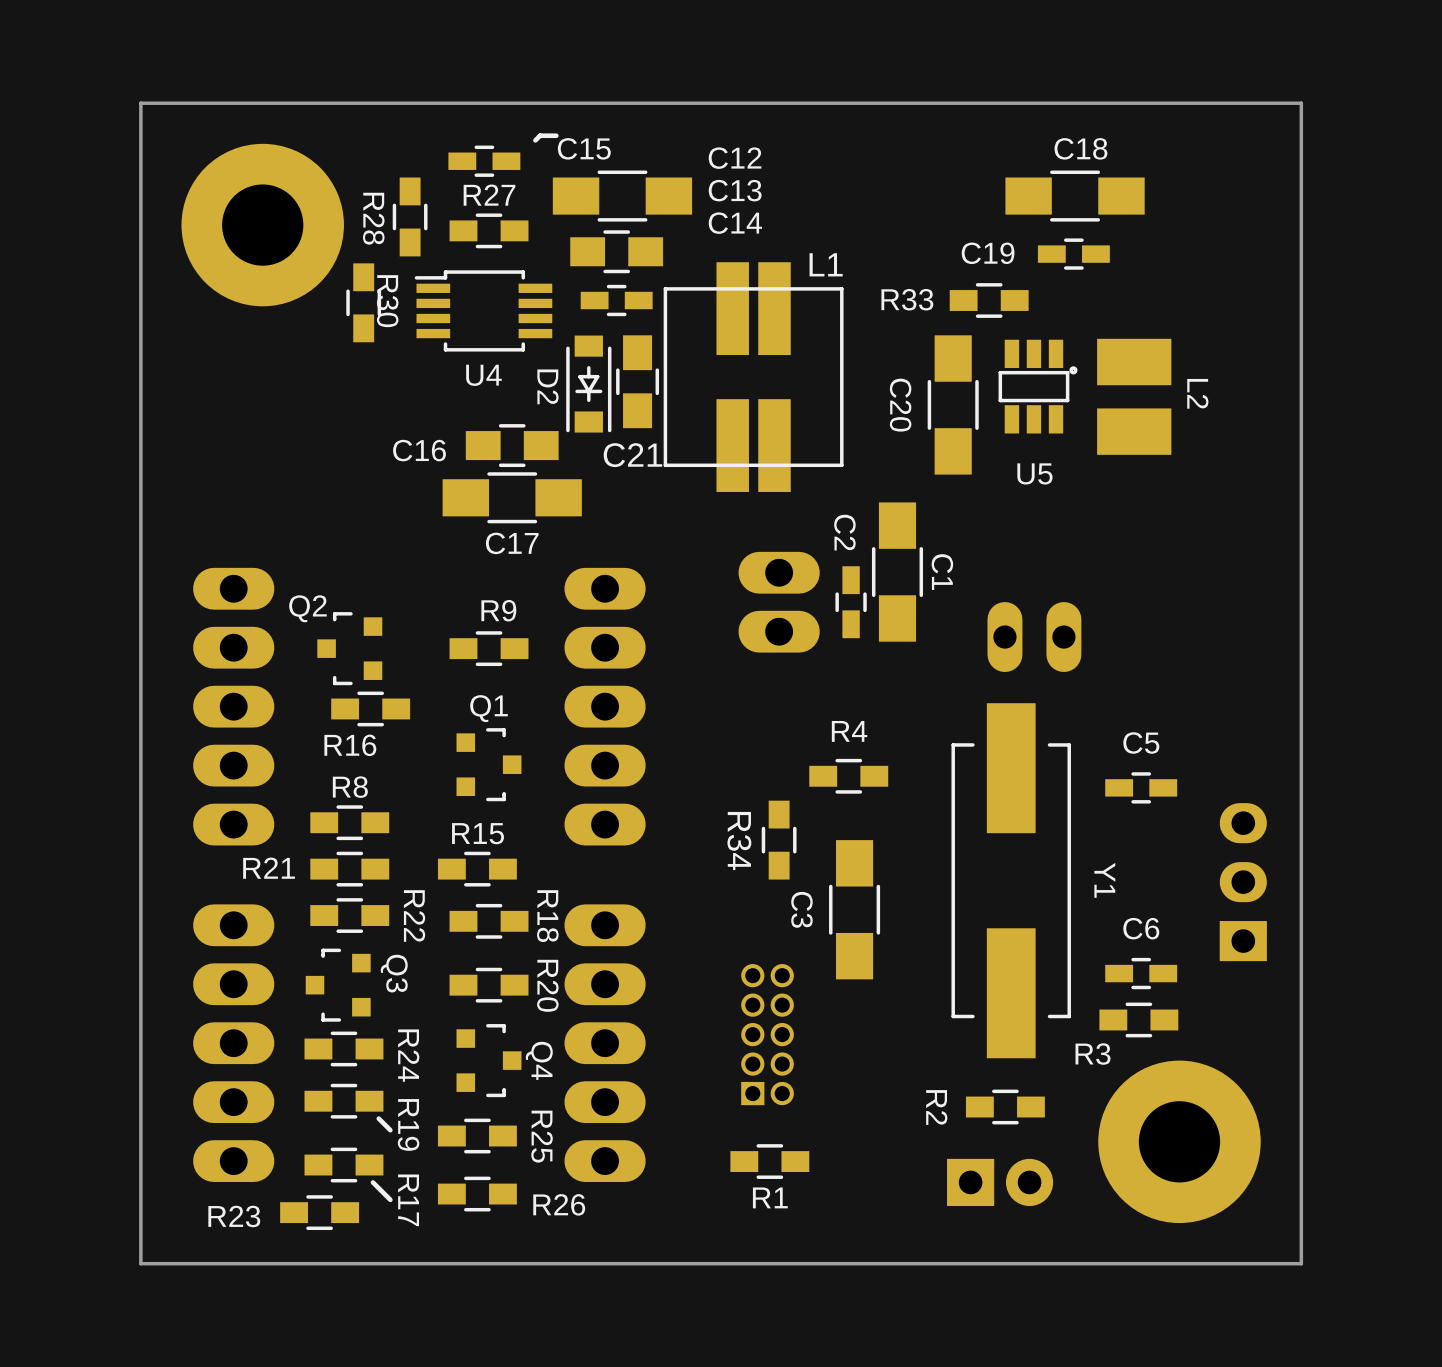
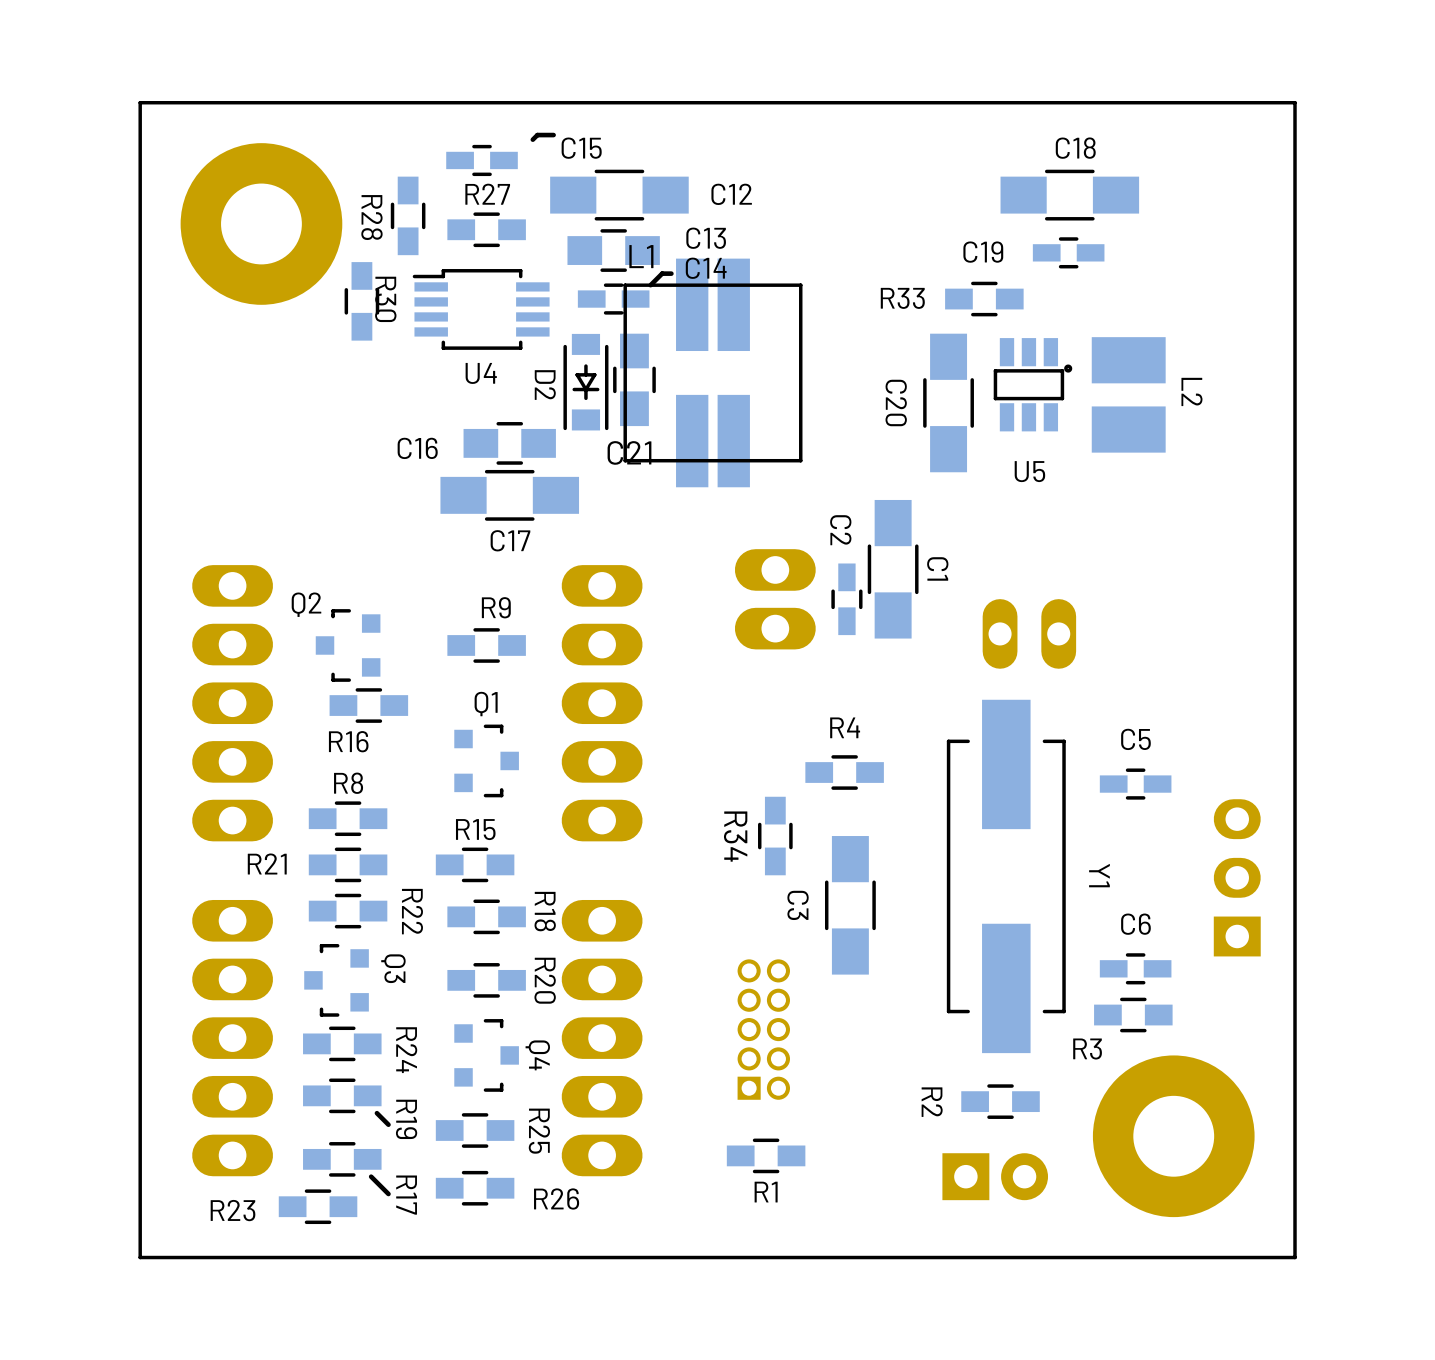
C12 name position: C12 (735, 158) -> C12 (731, 194)
C13 name position: C13 (735, 190) -> C13 (706, 238)
C14 name position: C14 (735, 223) -> C14 (706, 268)
L1 name position: L1 (826, 264) -> L1 (641, 256)
line: none -> (671, 273) (662, 273) (650, 285)
L1 position: (753, 377) -> (712, 372)

